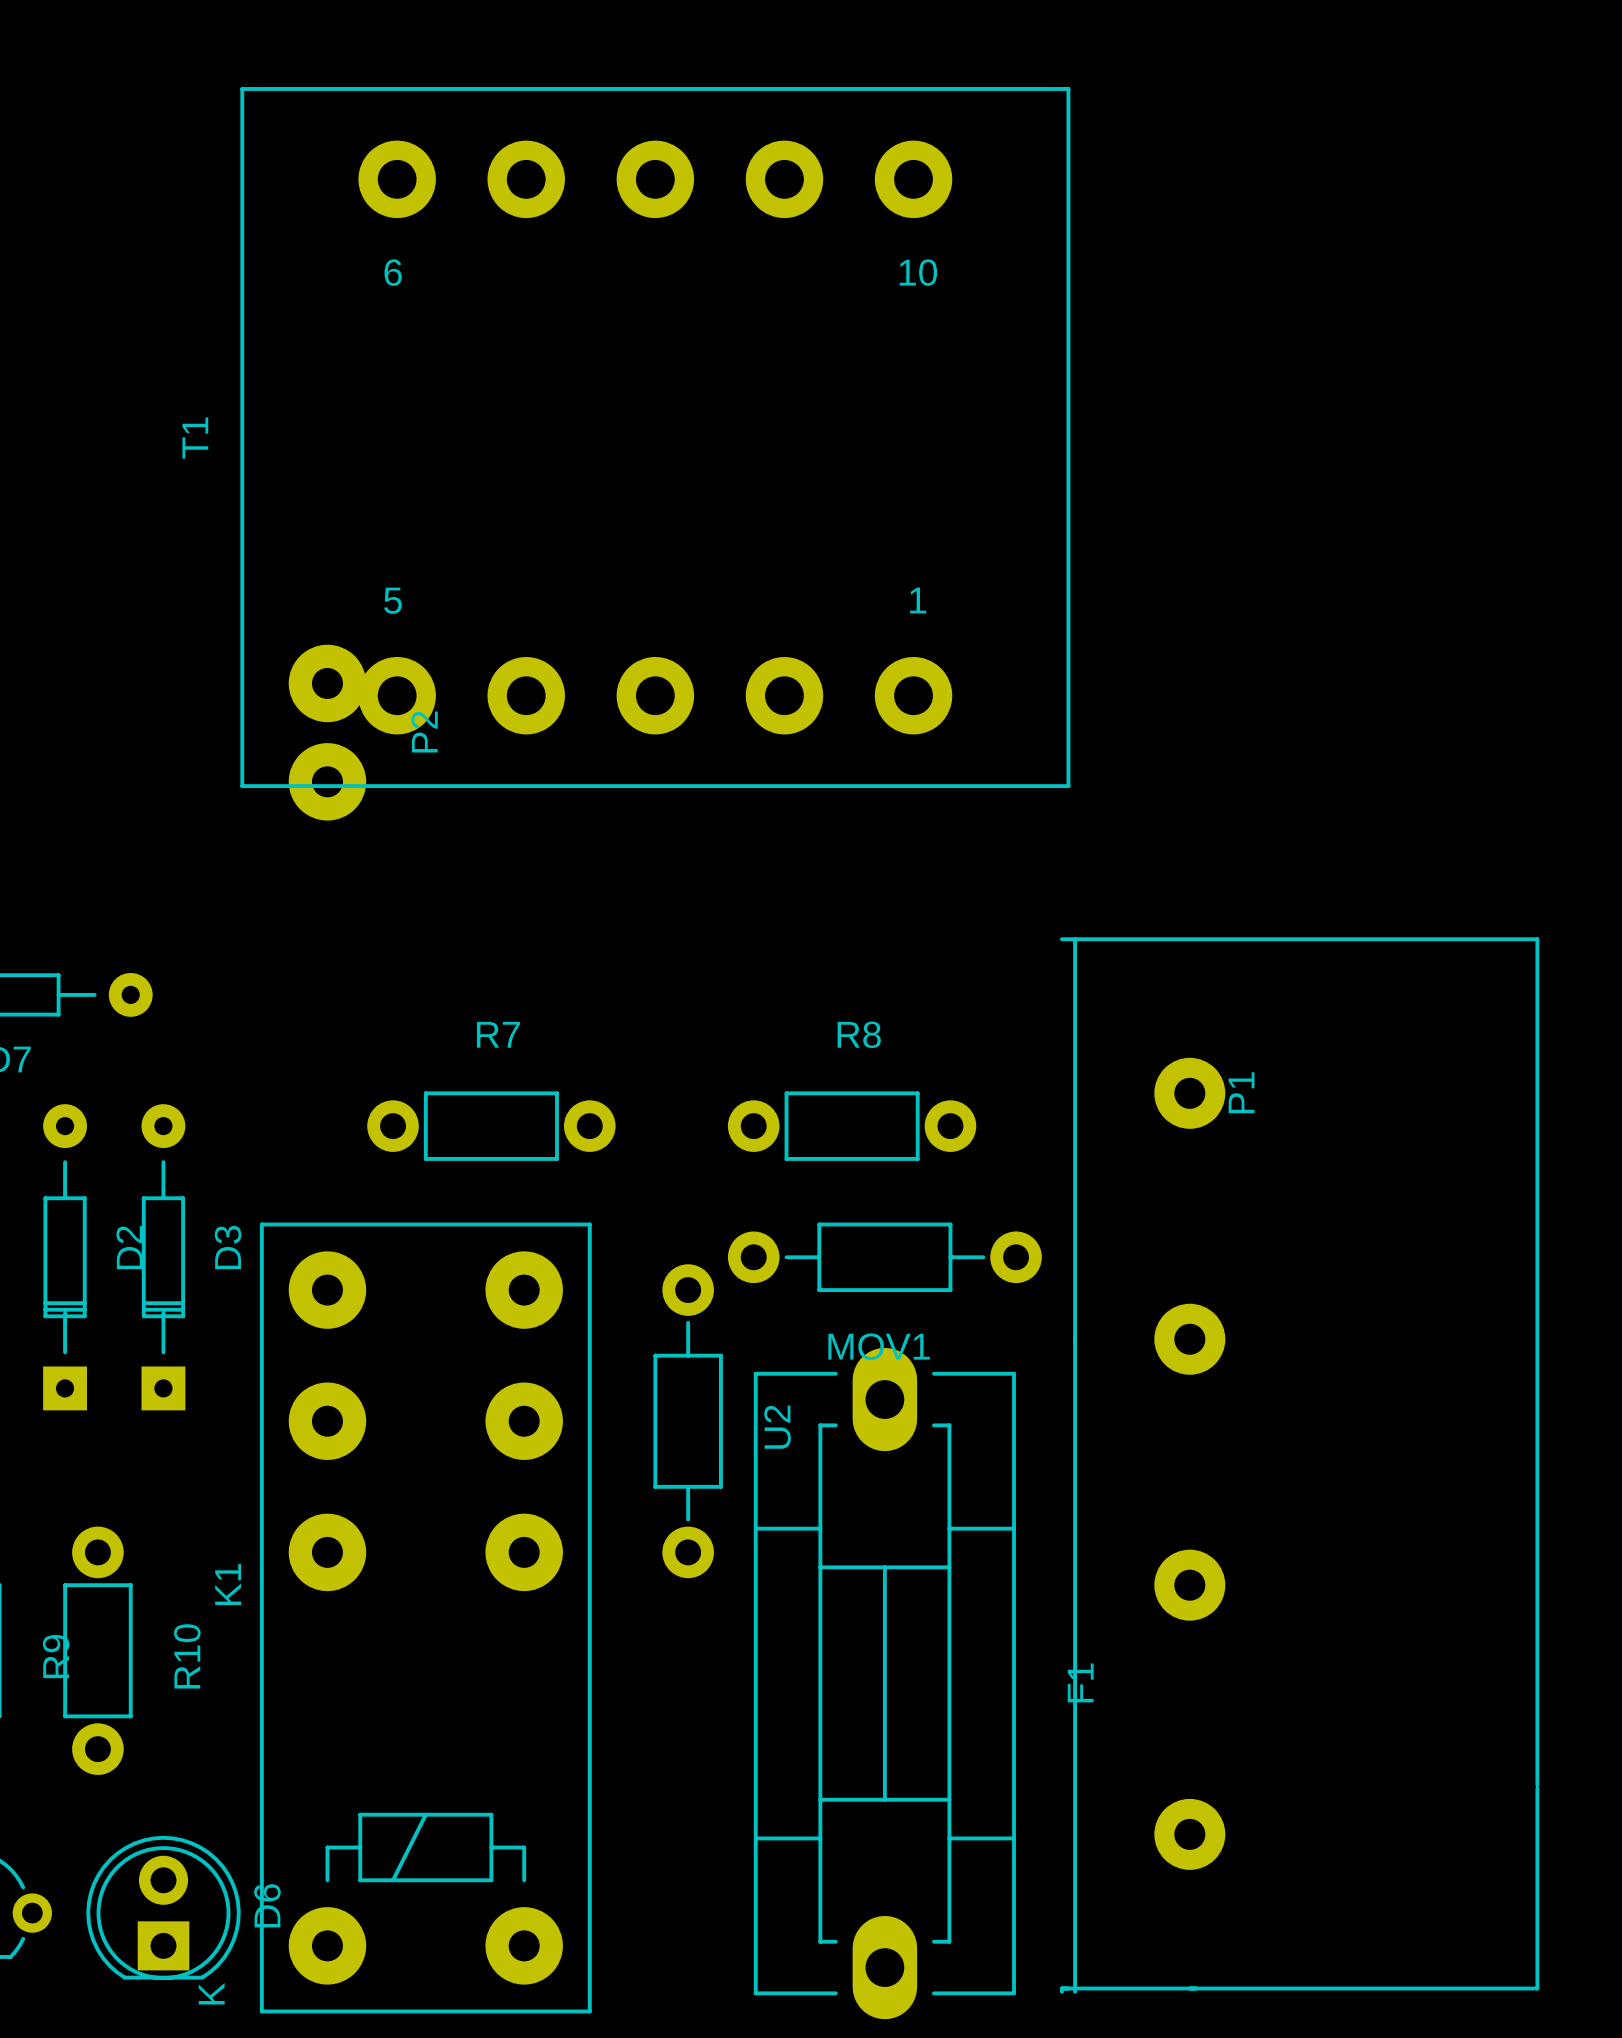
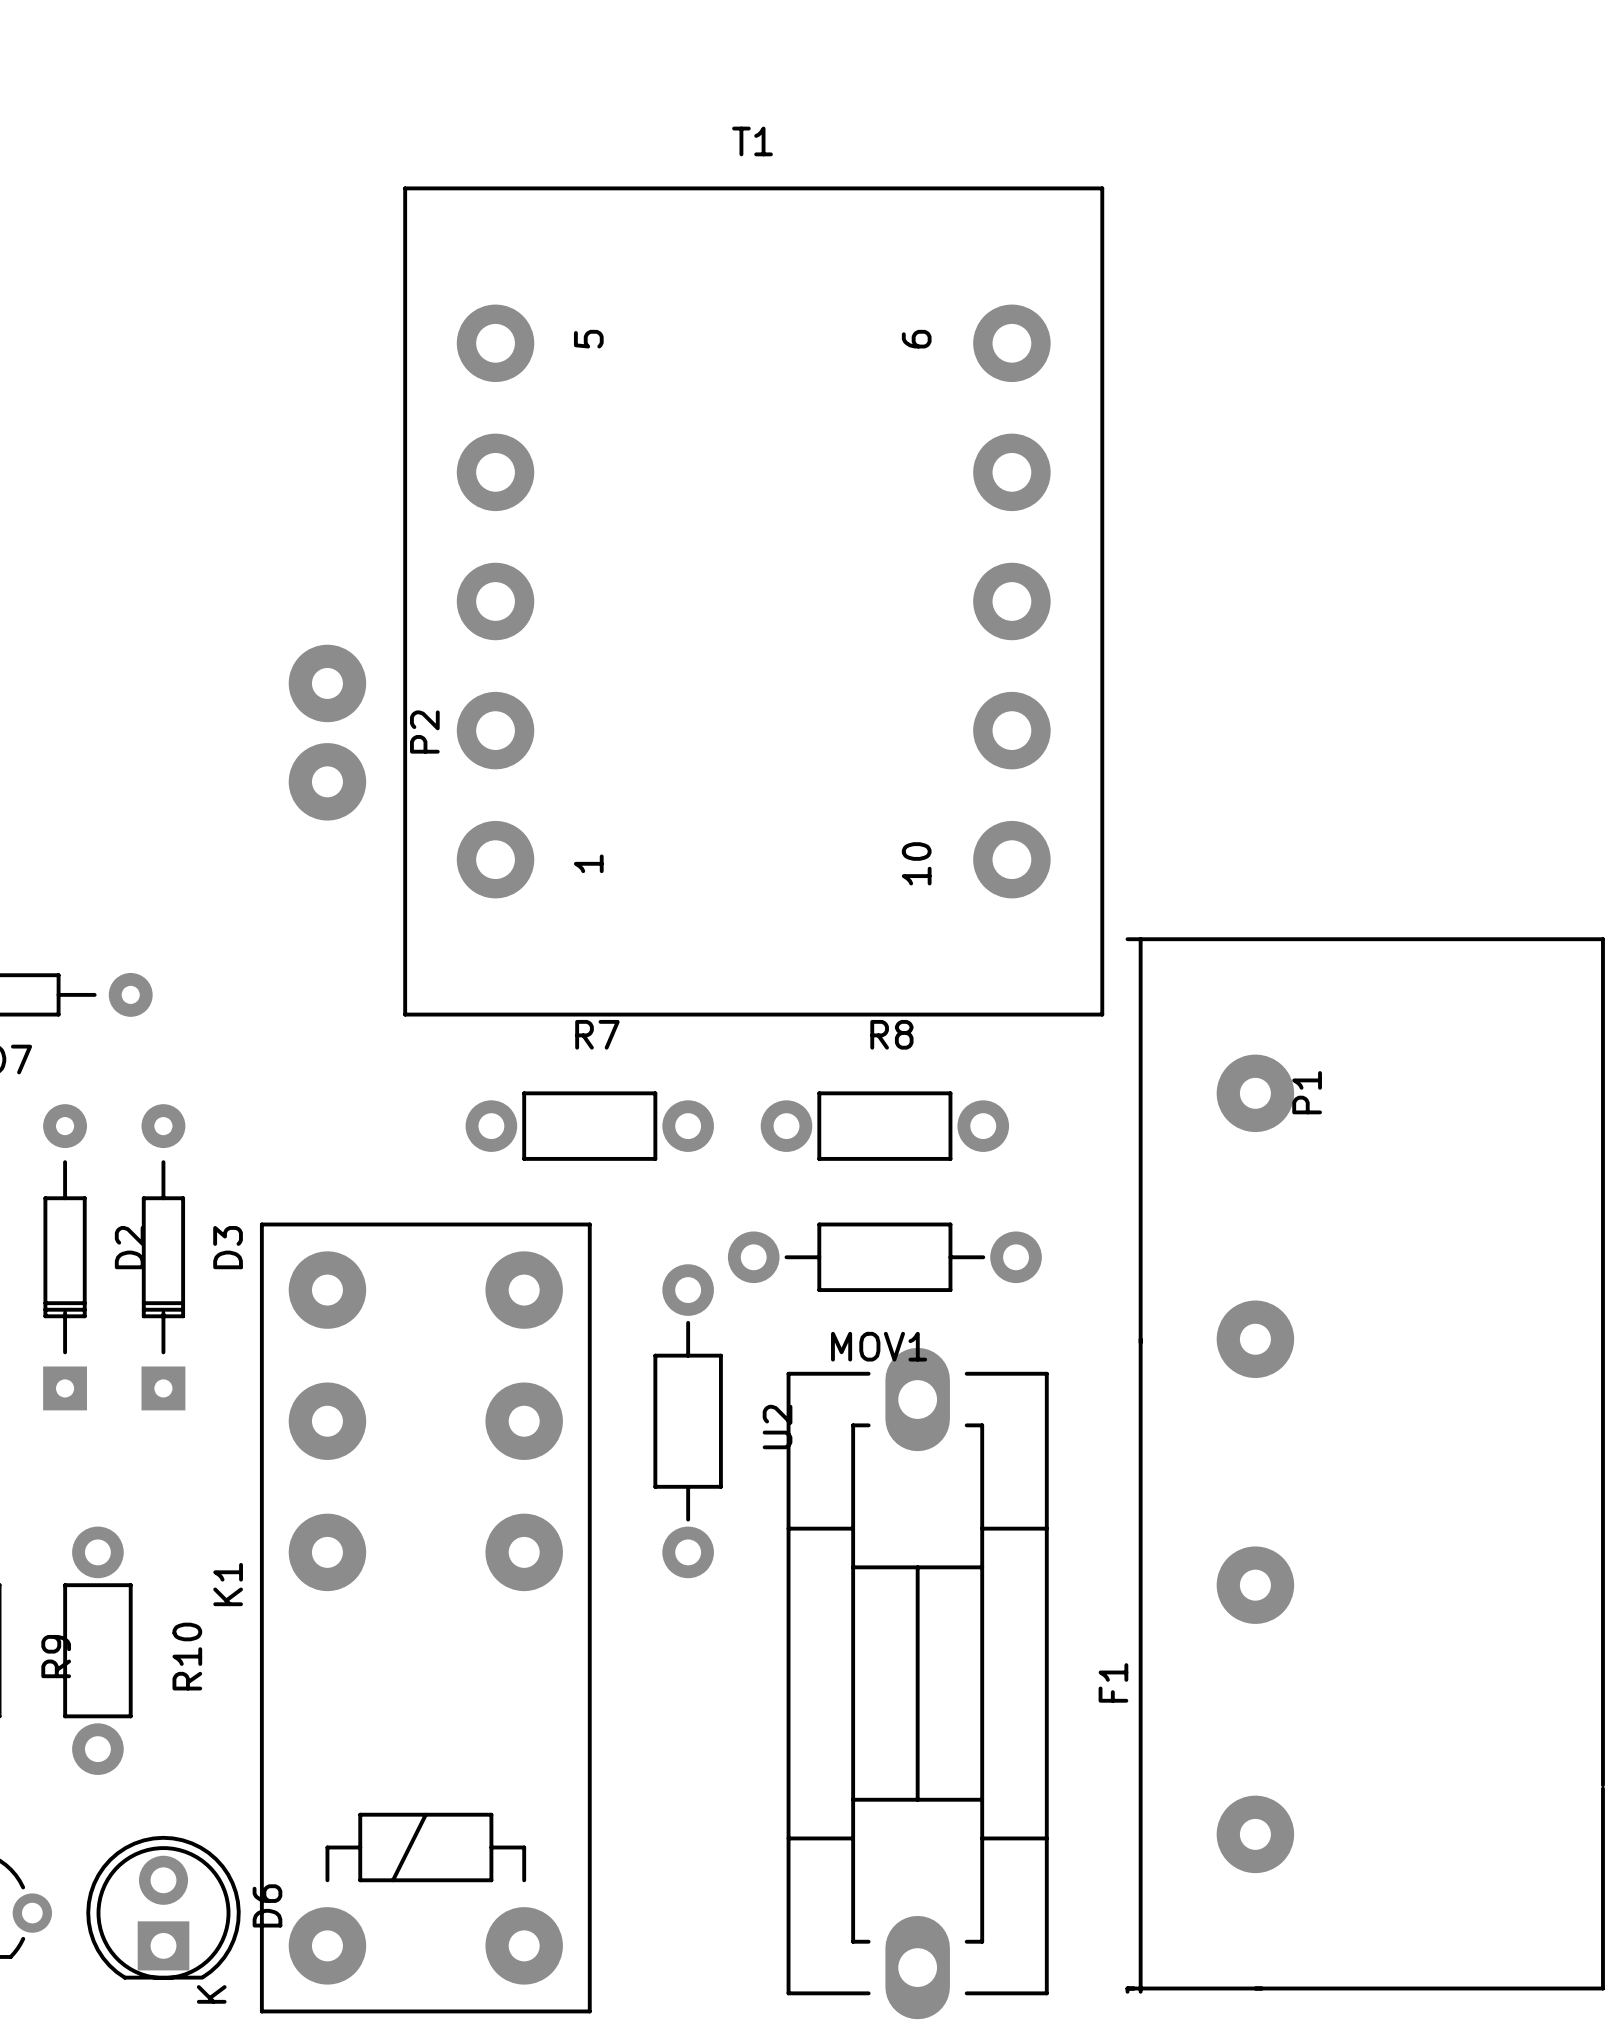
T1 rotation: 0° (655, 437) -> 90° clockwise (753, 601)
P1 footprint: [1060, 937, 1540, 1994] -> [1125, 937, 1605, 1994]
R7 position: (491, 1126) -> (589, 1126)
R8 position: (852, 1126) -> (884, 1126)
F1 position: (884, 1683) -> (917, 1683)

